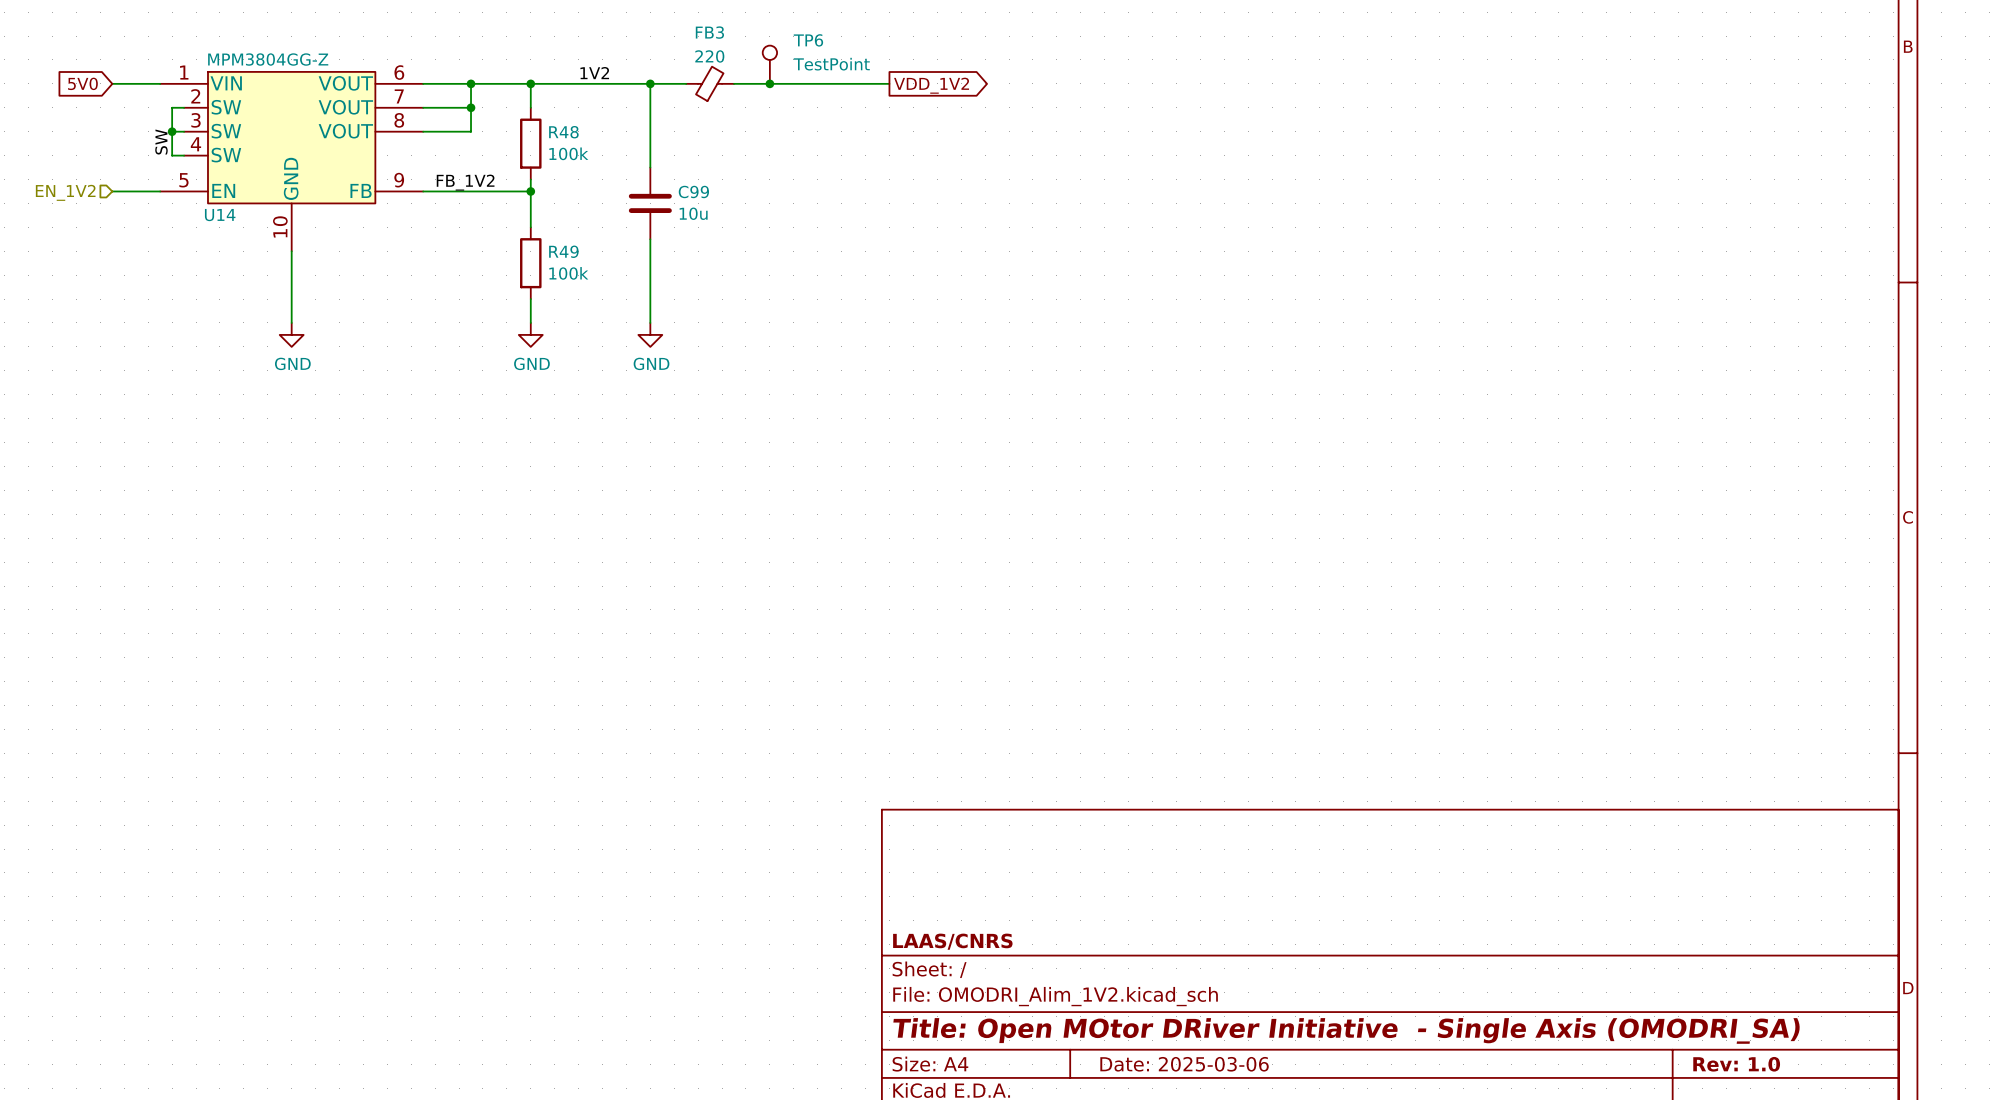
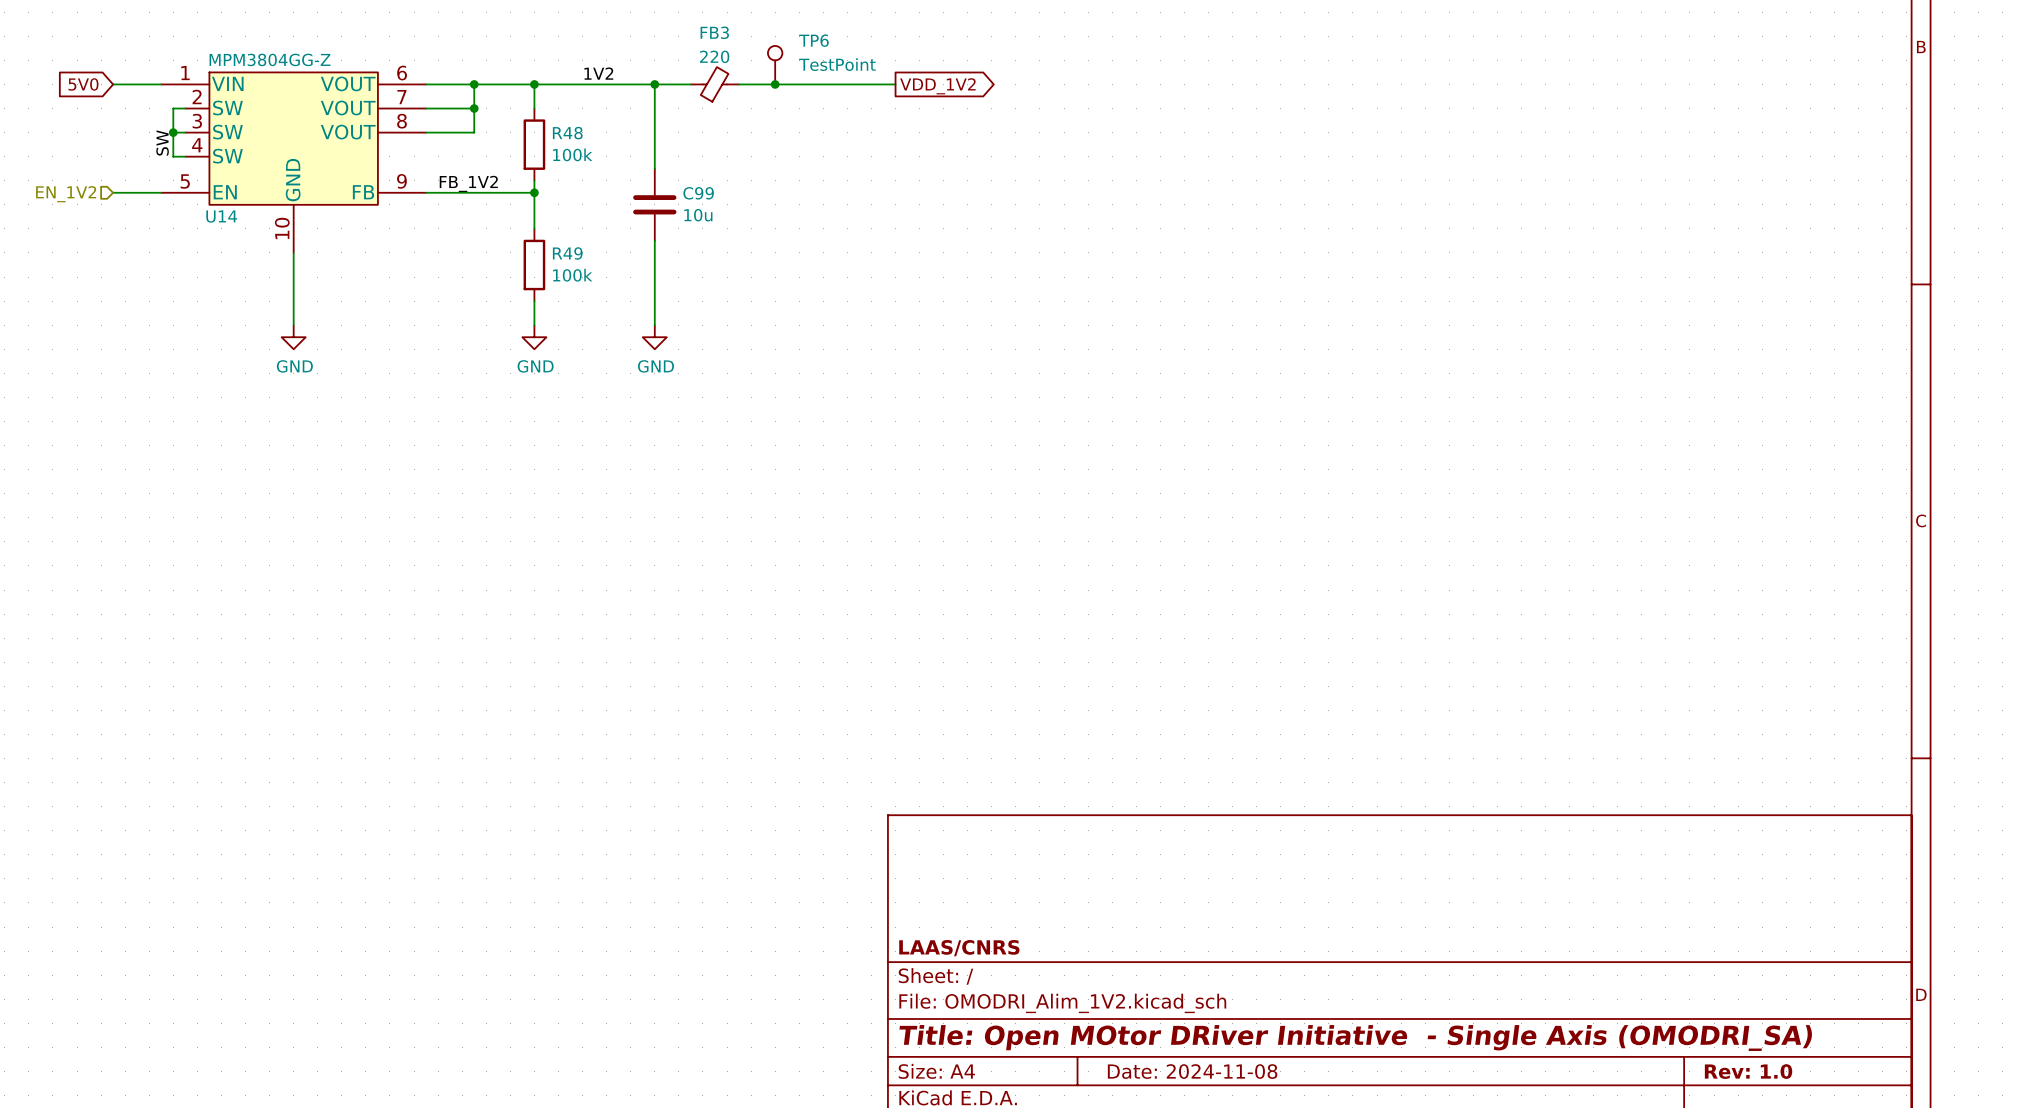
title block: Date: 2025-03-06 (1184, 1064) -> Date: 2024-11-08 (1192, 1071)

